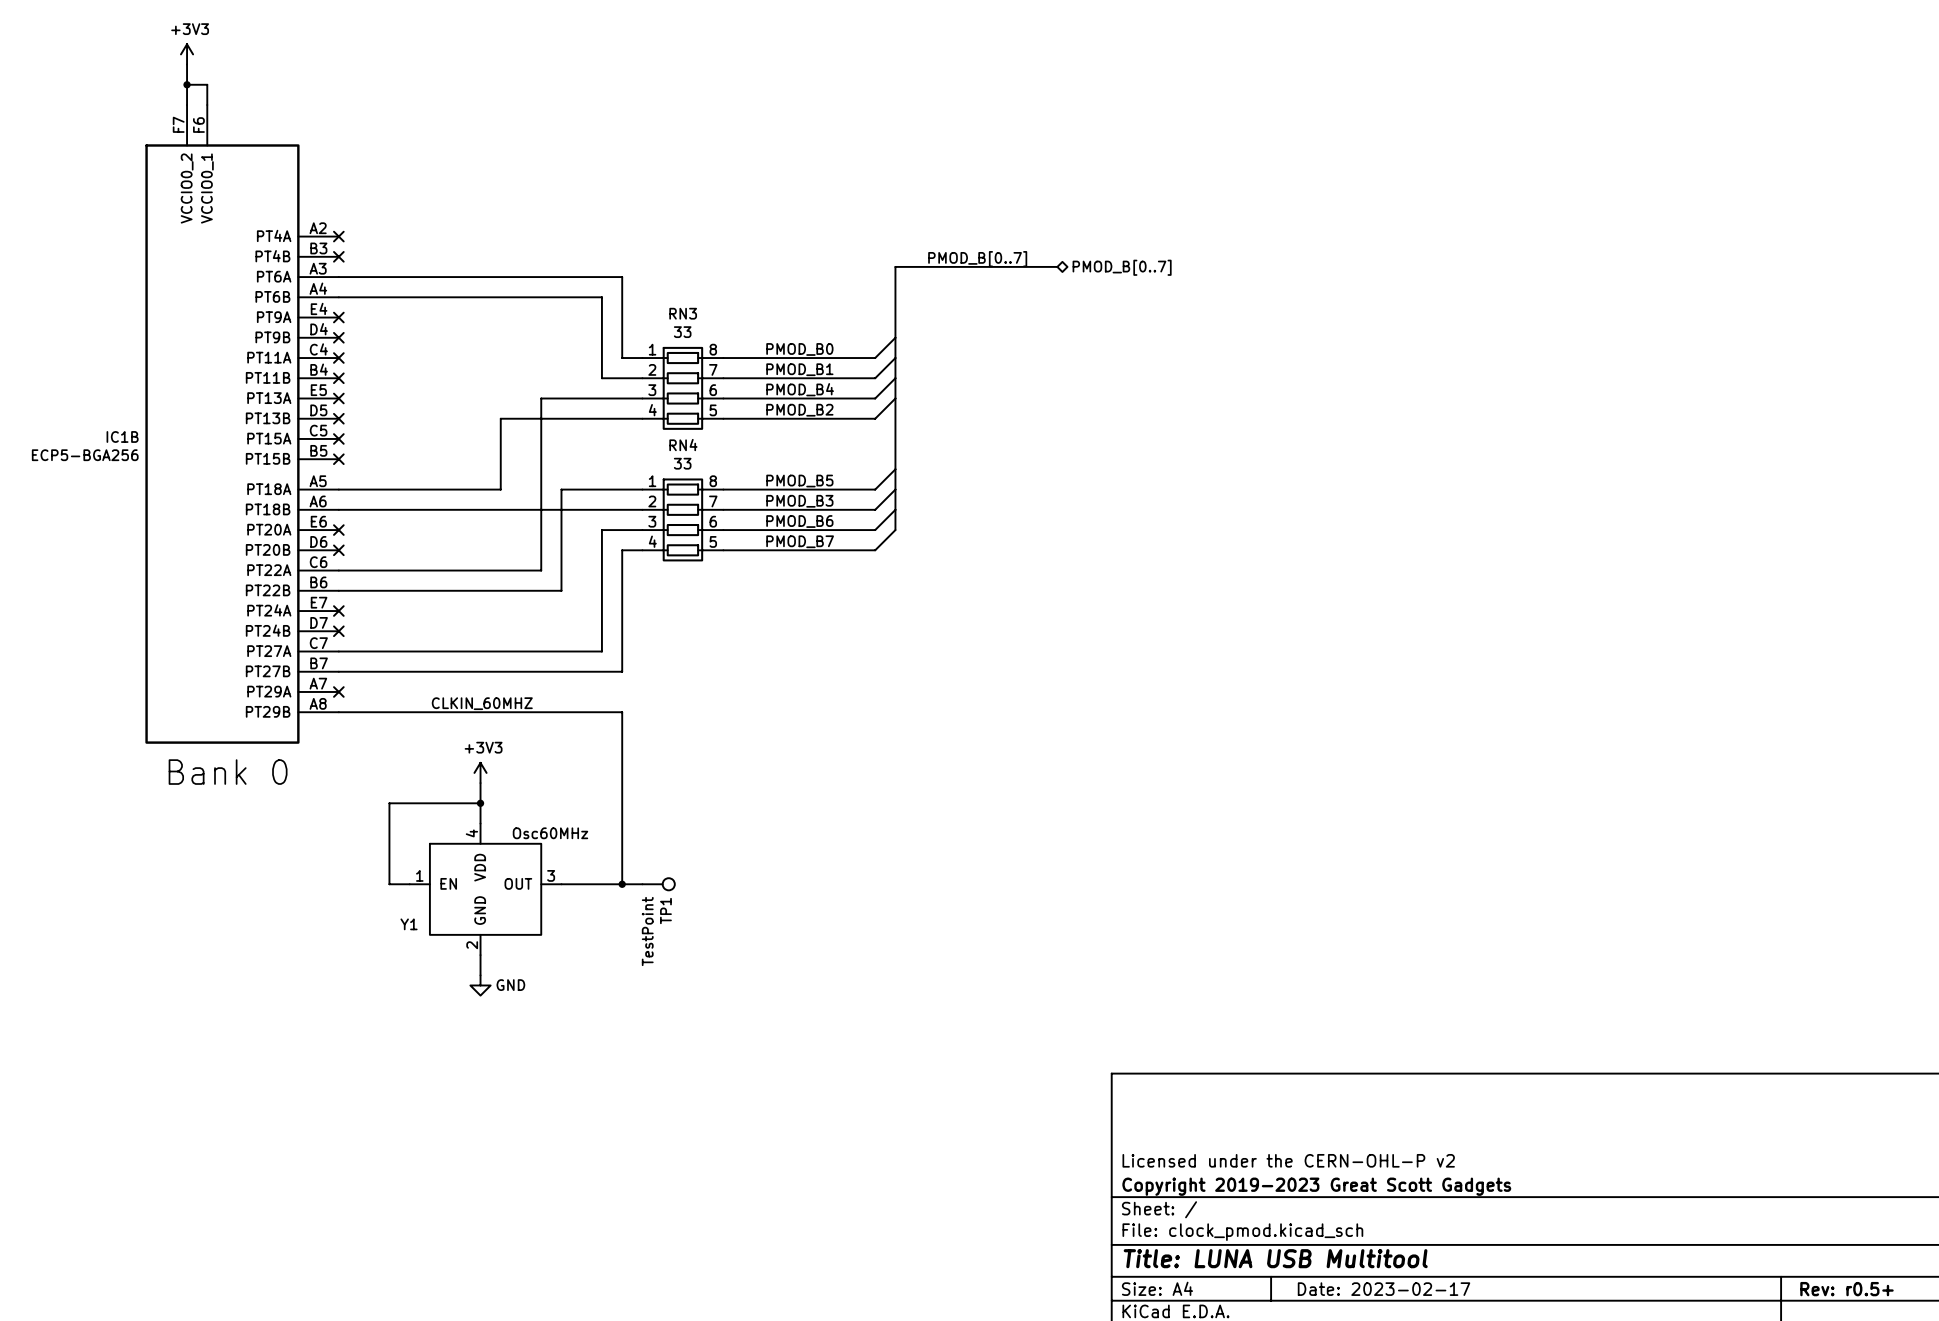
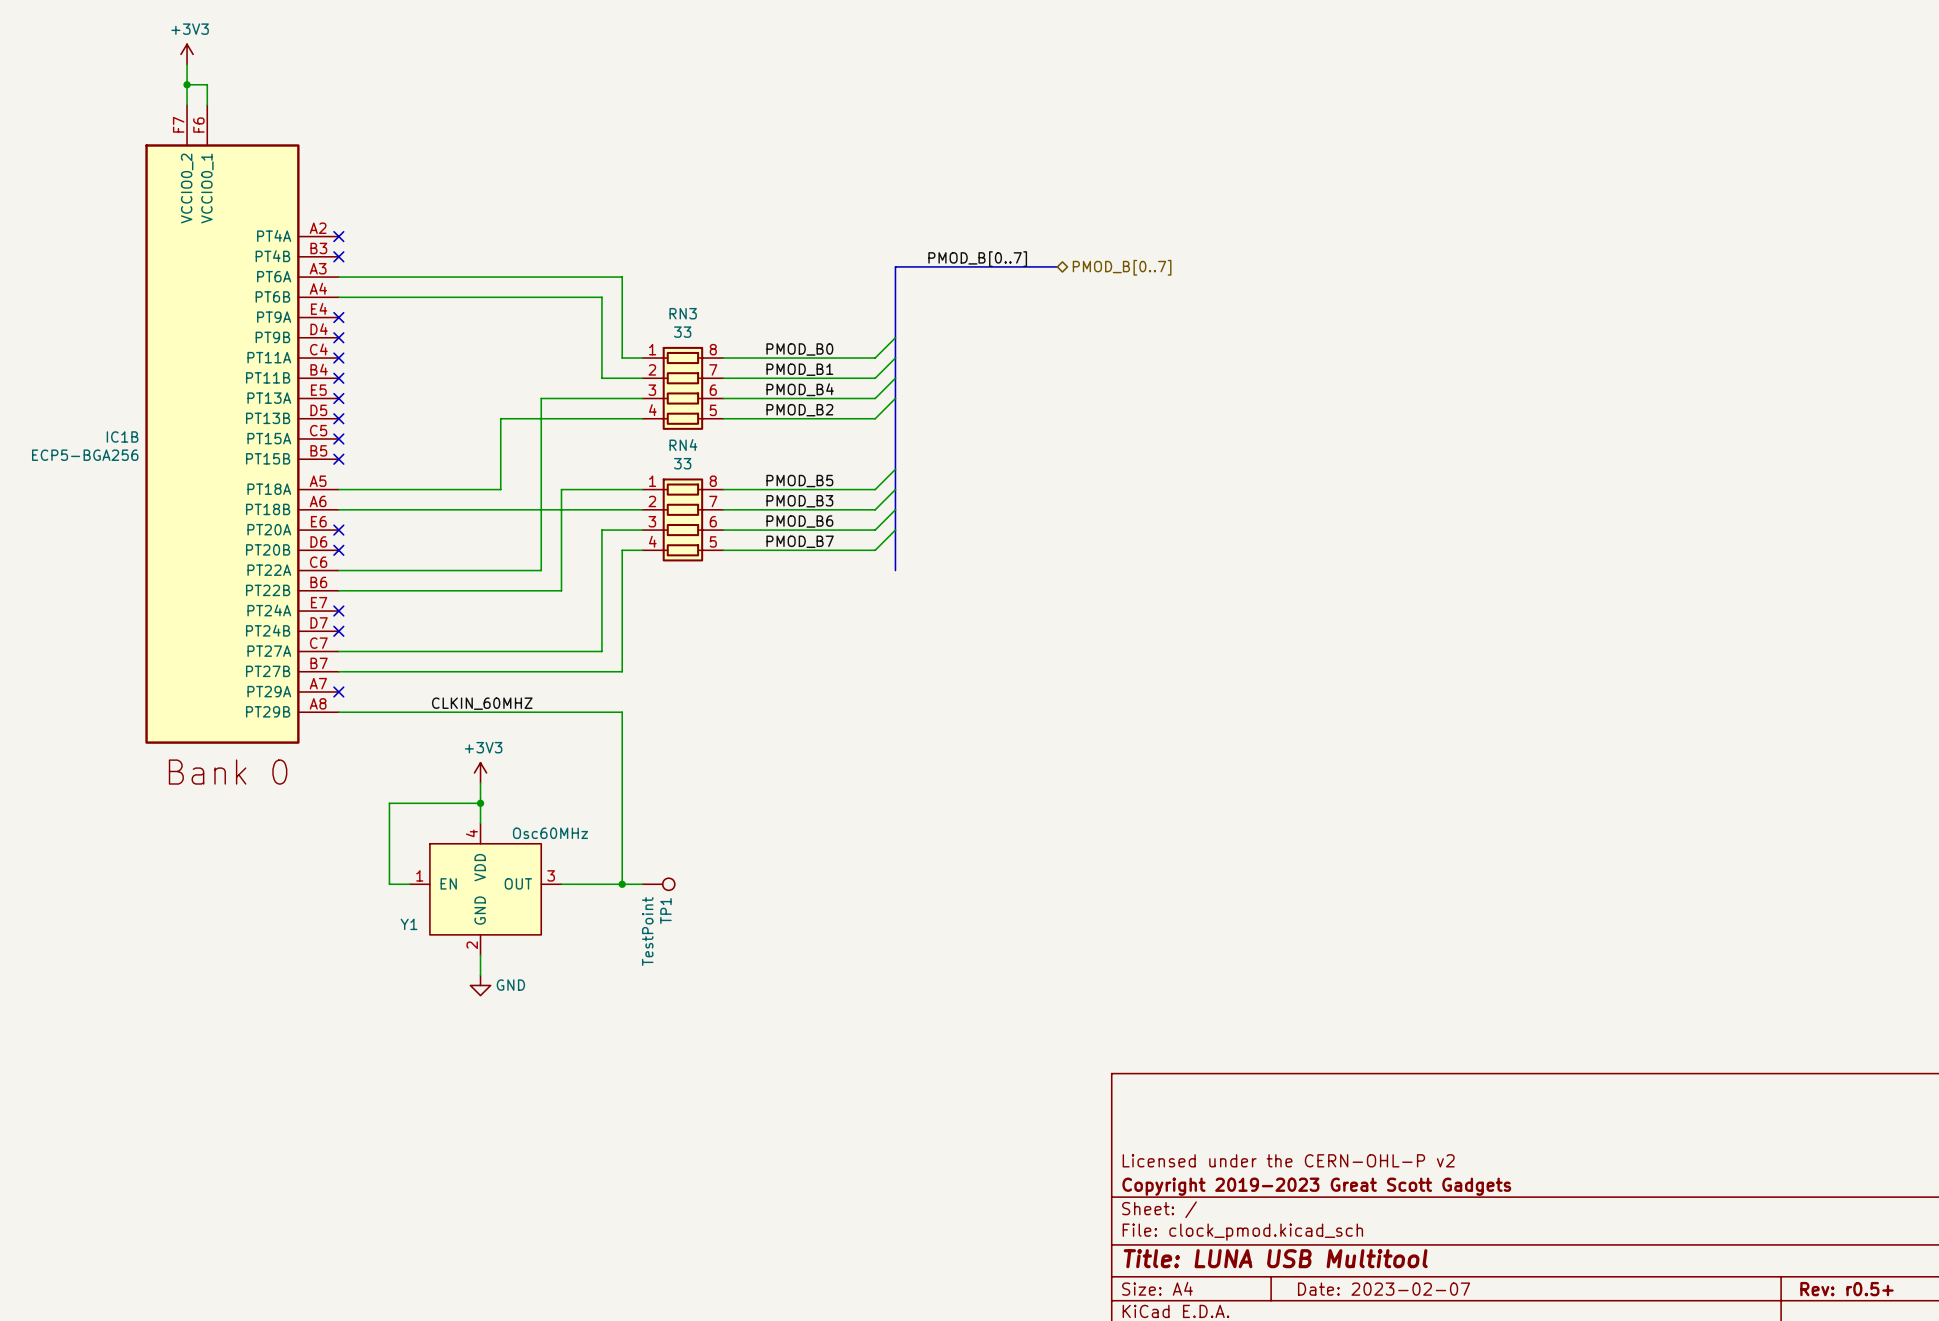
bus: none -> (895, 530) (895, 570)
title block: Date: 2023-02-17 (1384, 1289) -> Date: 2023-02-07 (1384, 1289)

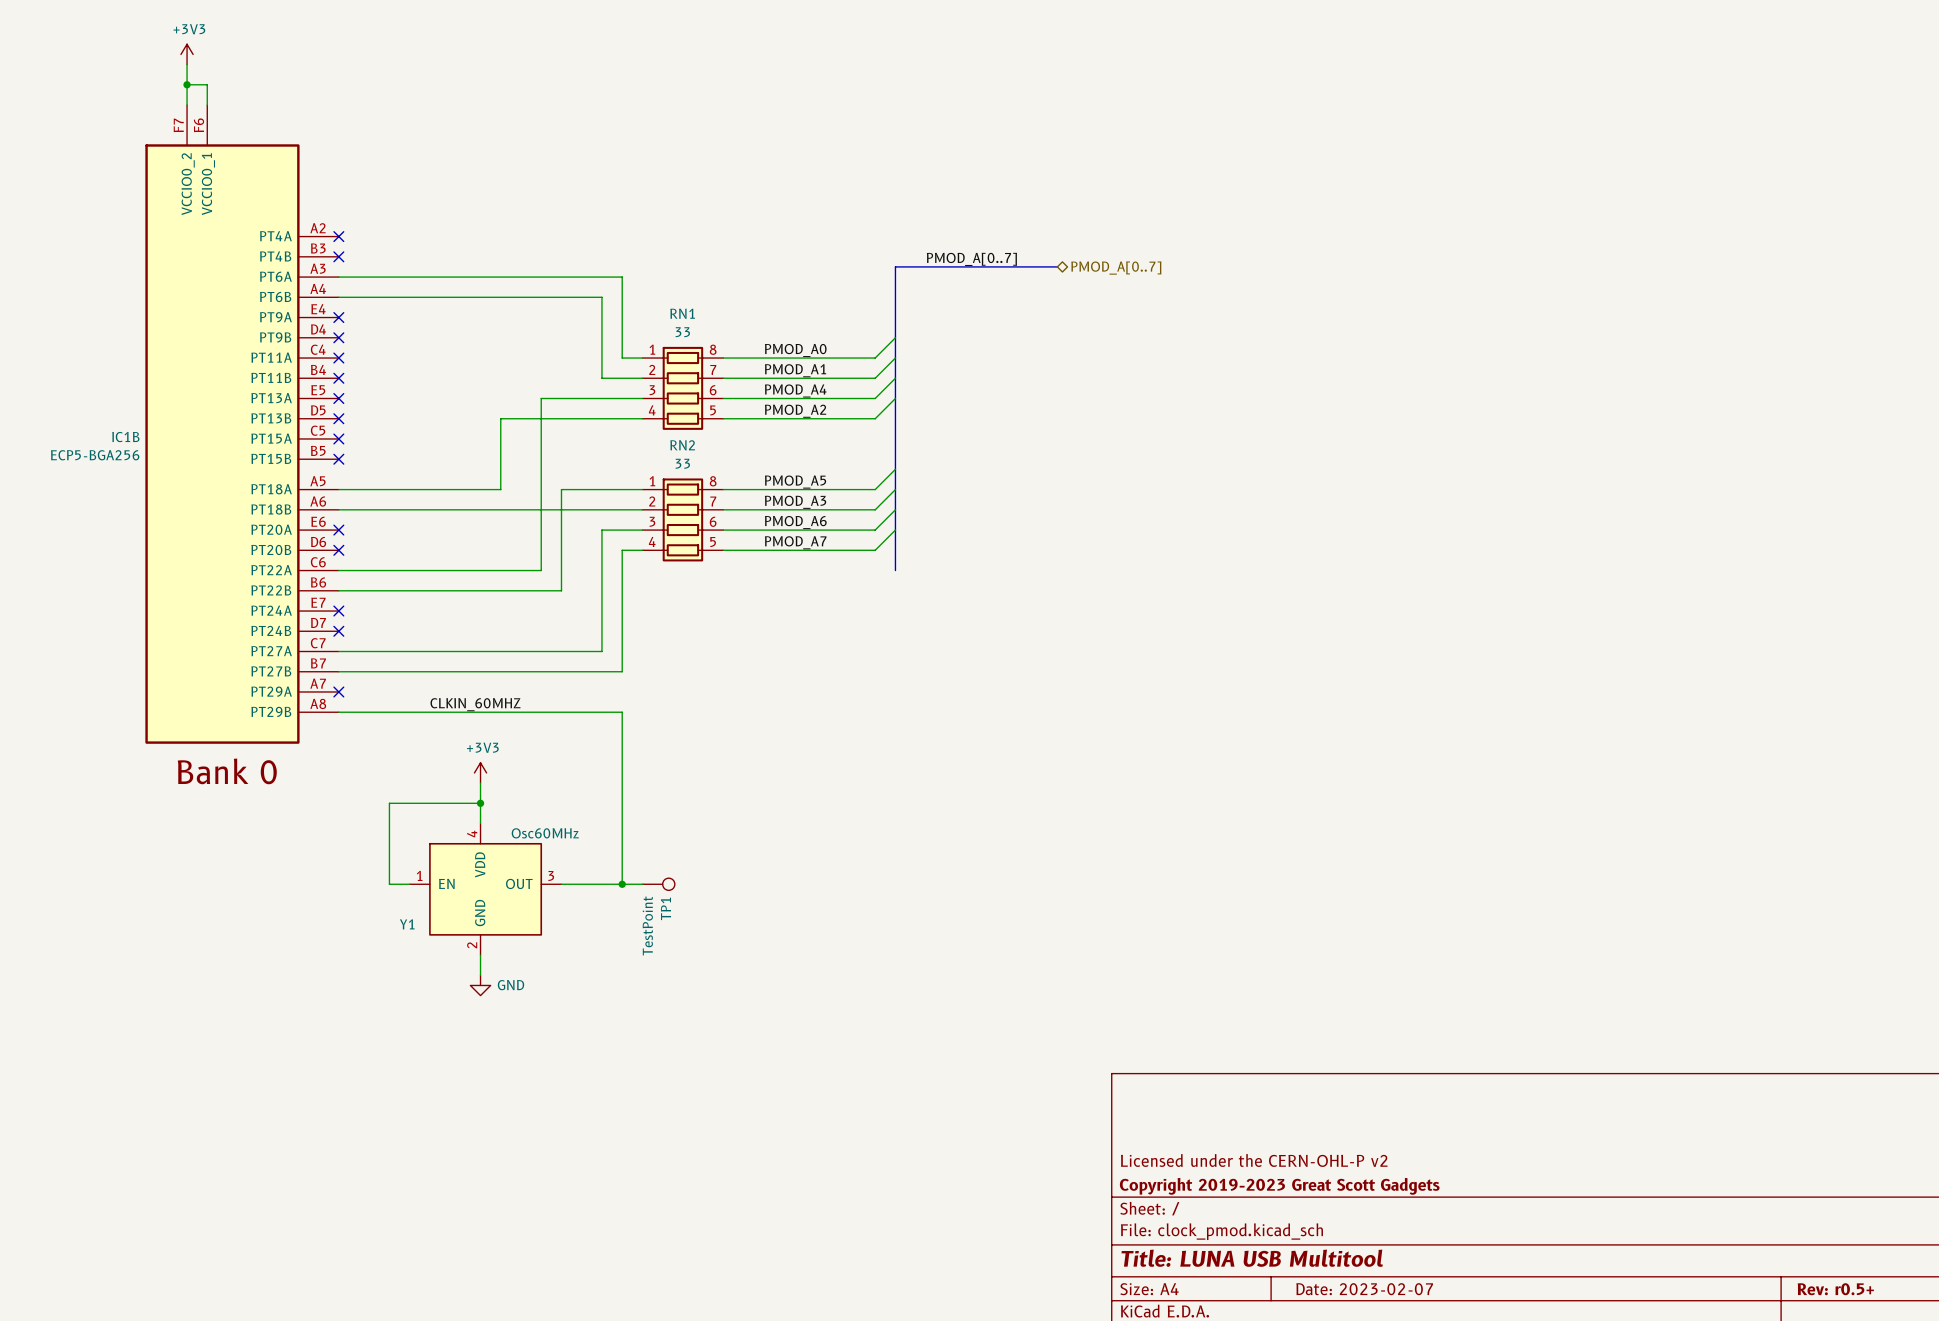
label: PMOD_B[0..7] (977, 259) -> PMOD_A[0..7] (971, 259)
hierarchical label: PMOD_B[0..7] (1122, 267) -> PMOD_A[0..7] (1116, 268)
RN3 name: RN3 (683, 313) -> RN1 (682, 313)
label: PMOD_B0 (799, 349) -> PMOD_A0 (795, 350)
label: PMOD_B1 (799, 369) -> PMOD_A1 (795, 370)
label: PMOD_B4 (800, 389) -> PMOD_A4 (795, 390)
label: PMOD_B2 (799, 410) -> PMOD_A2 (795, 411)
RN4 name: RN4 (683, 445) -> RN2 (682, 445)
label: PMOD_B5 (799, 481) -> PMOD_A5 (795, 482)
label: PMOD_B3 (799, 501) -> PMOD_A3 (795, 502)
label: PMOD_B6 (799, 521) -> PMOD_A6 (795, 522)
label: PMOD_B7 (800, 541) -> PMOD_A7 (795, 542)

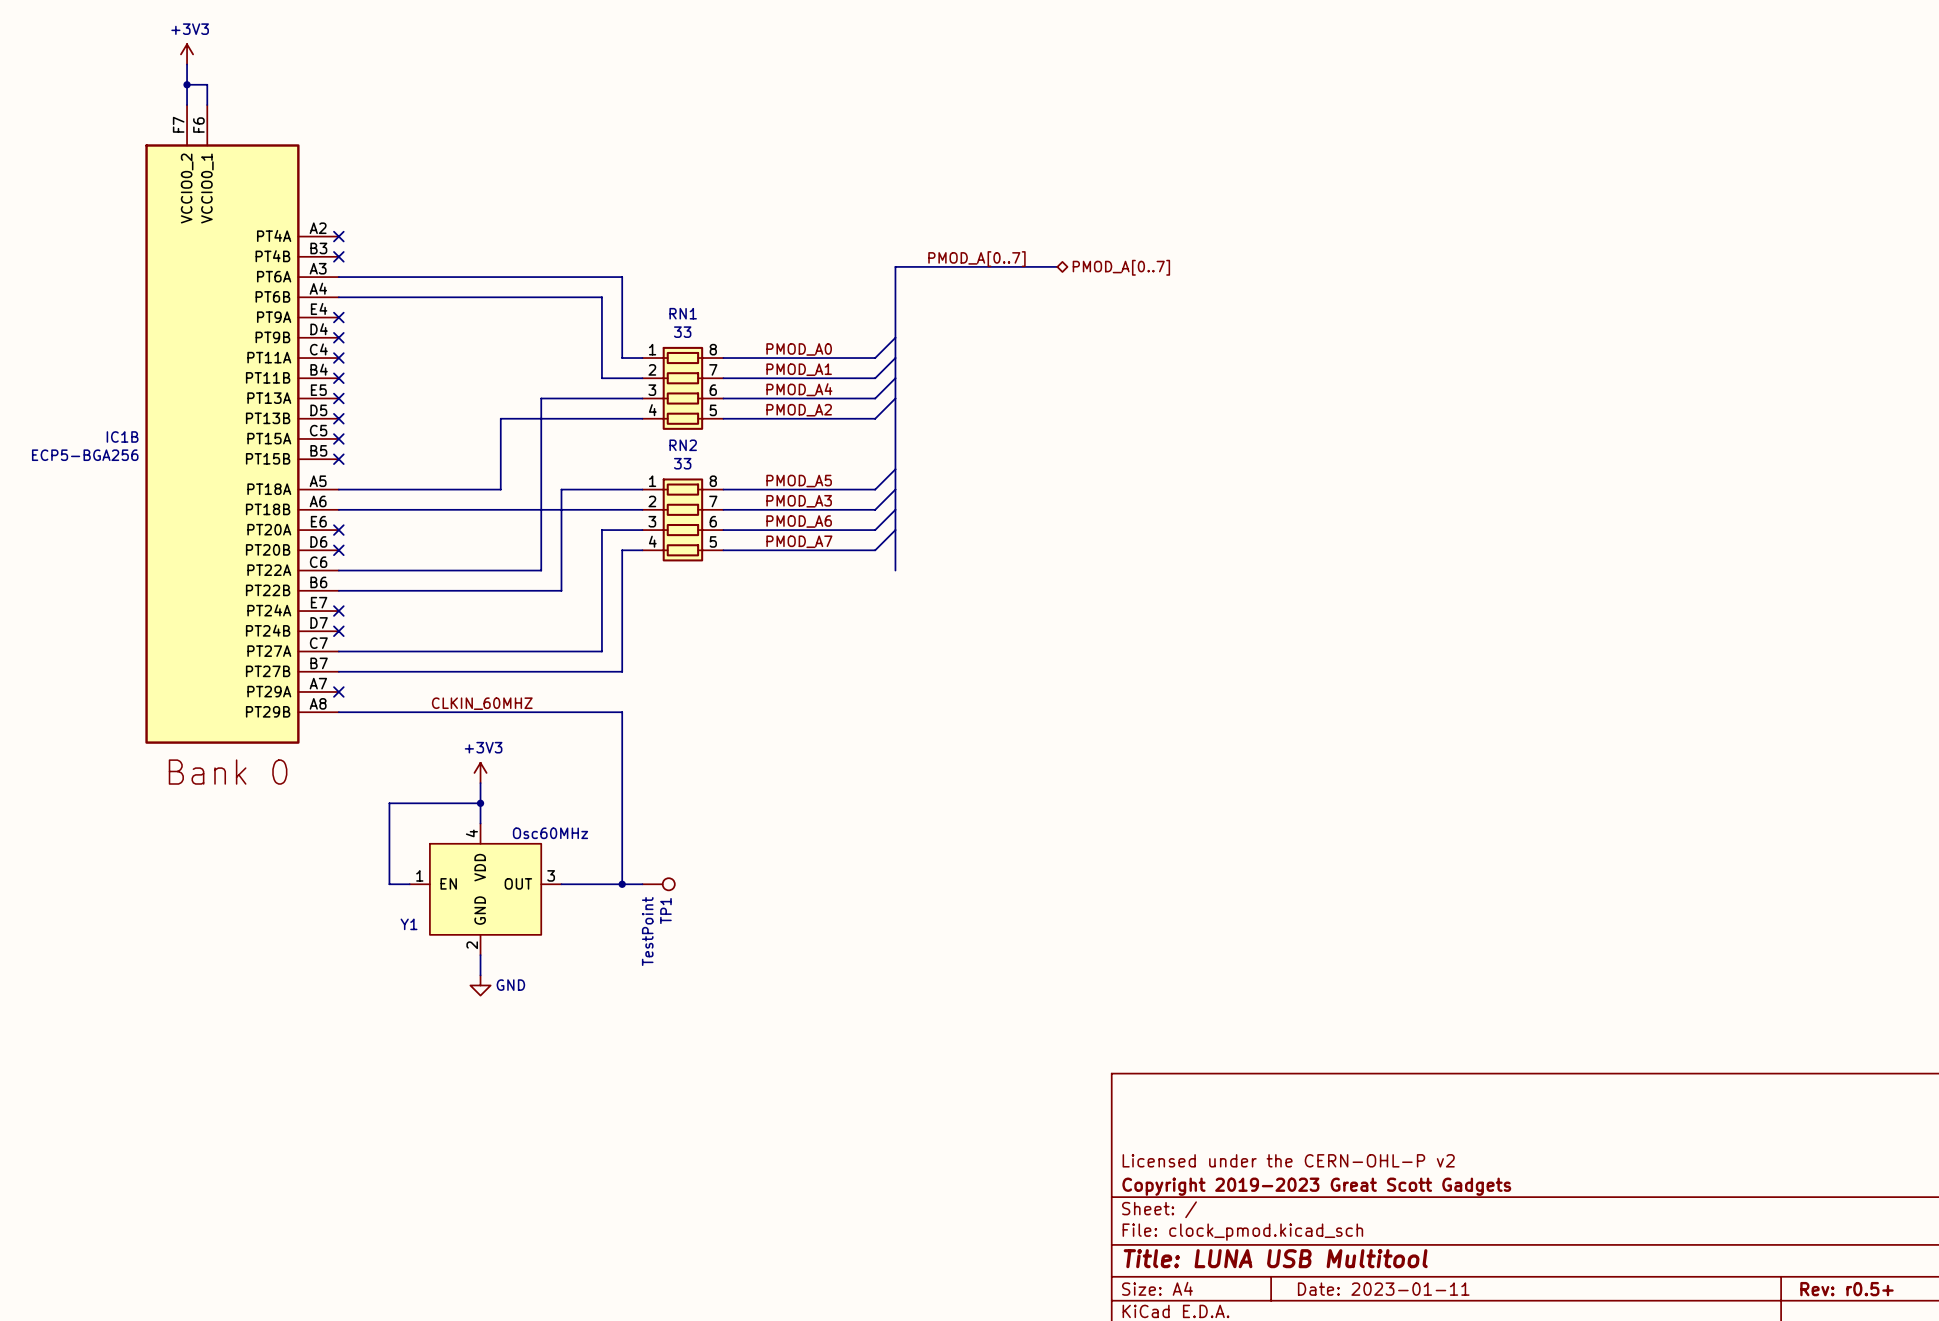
title block: Date: 2023-02-07 (1364, 1289) -> Date: 2023-01-11 (1383, 1289)

